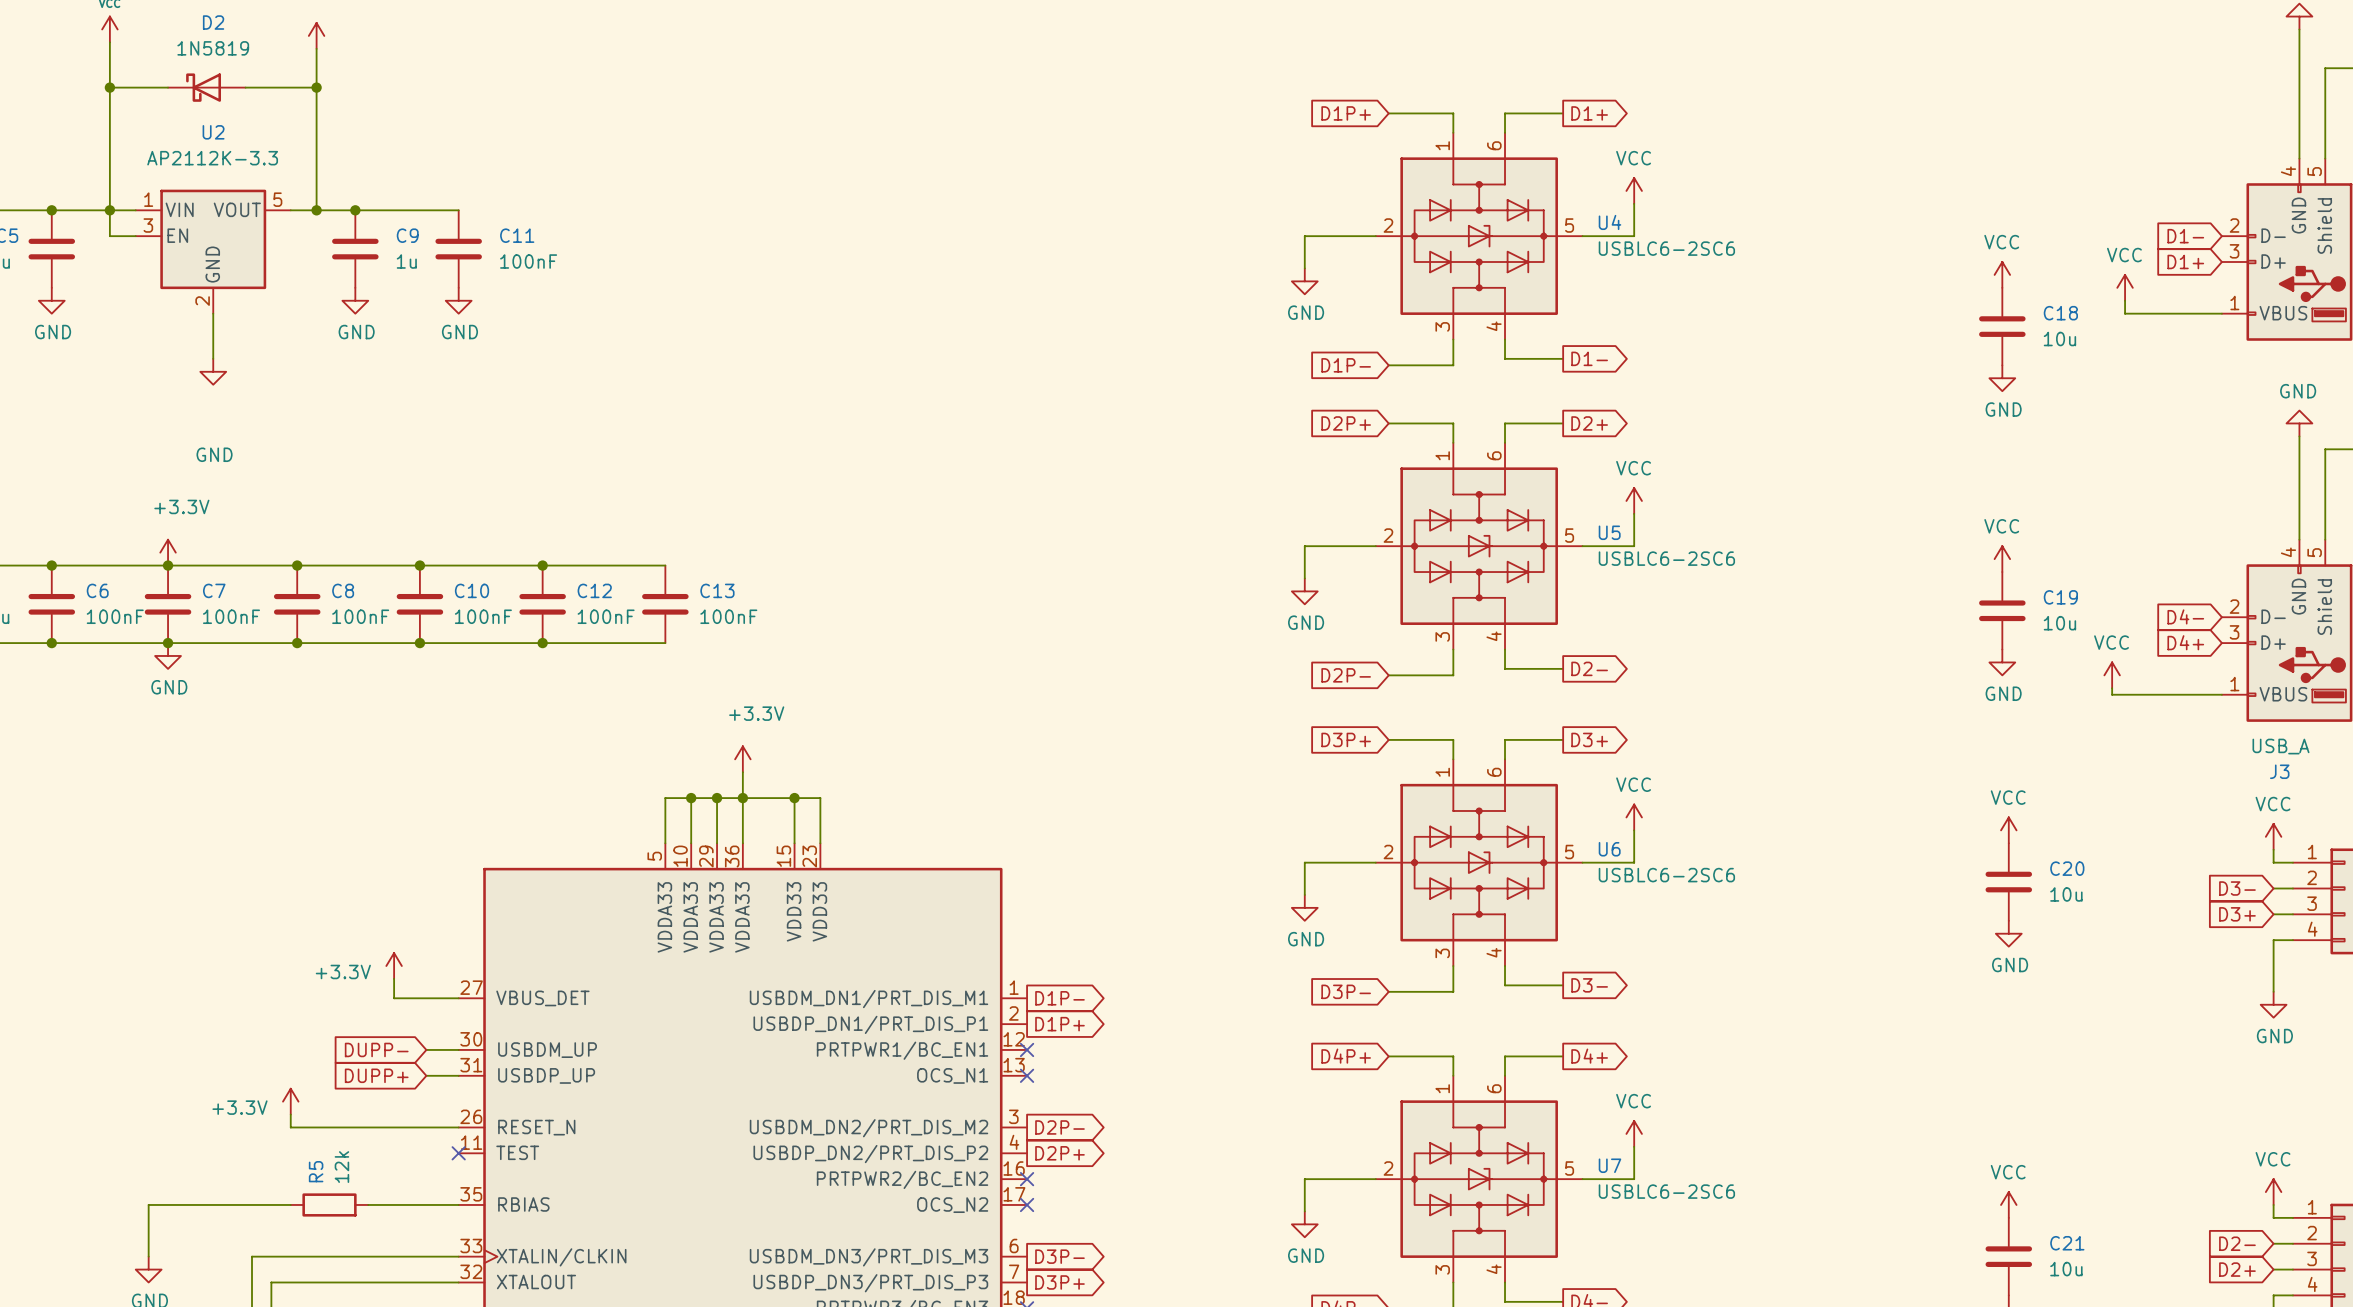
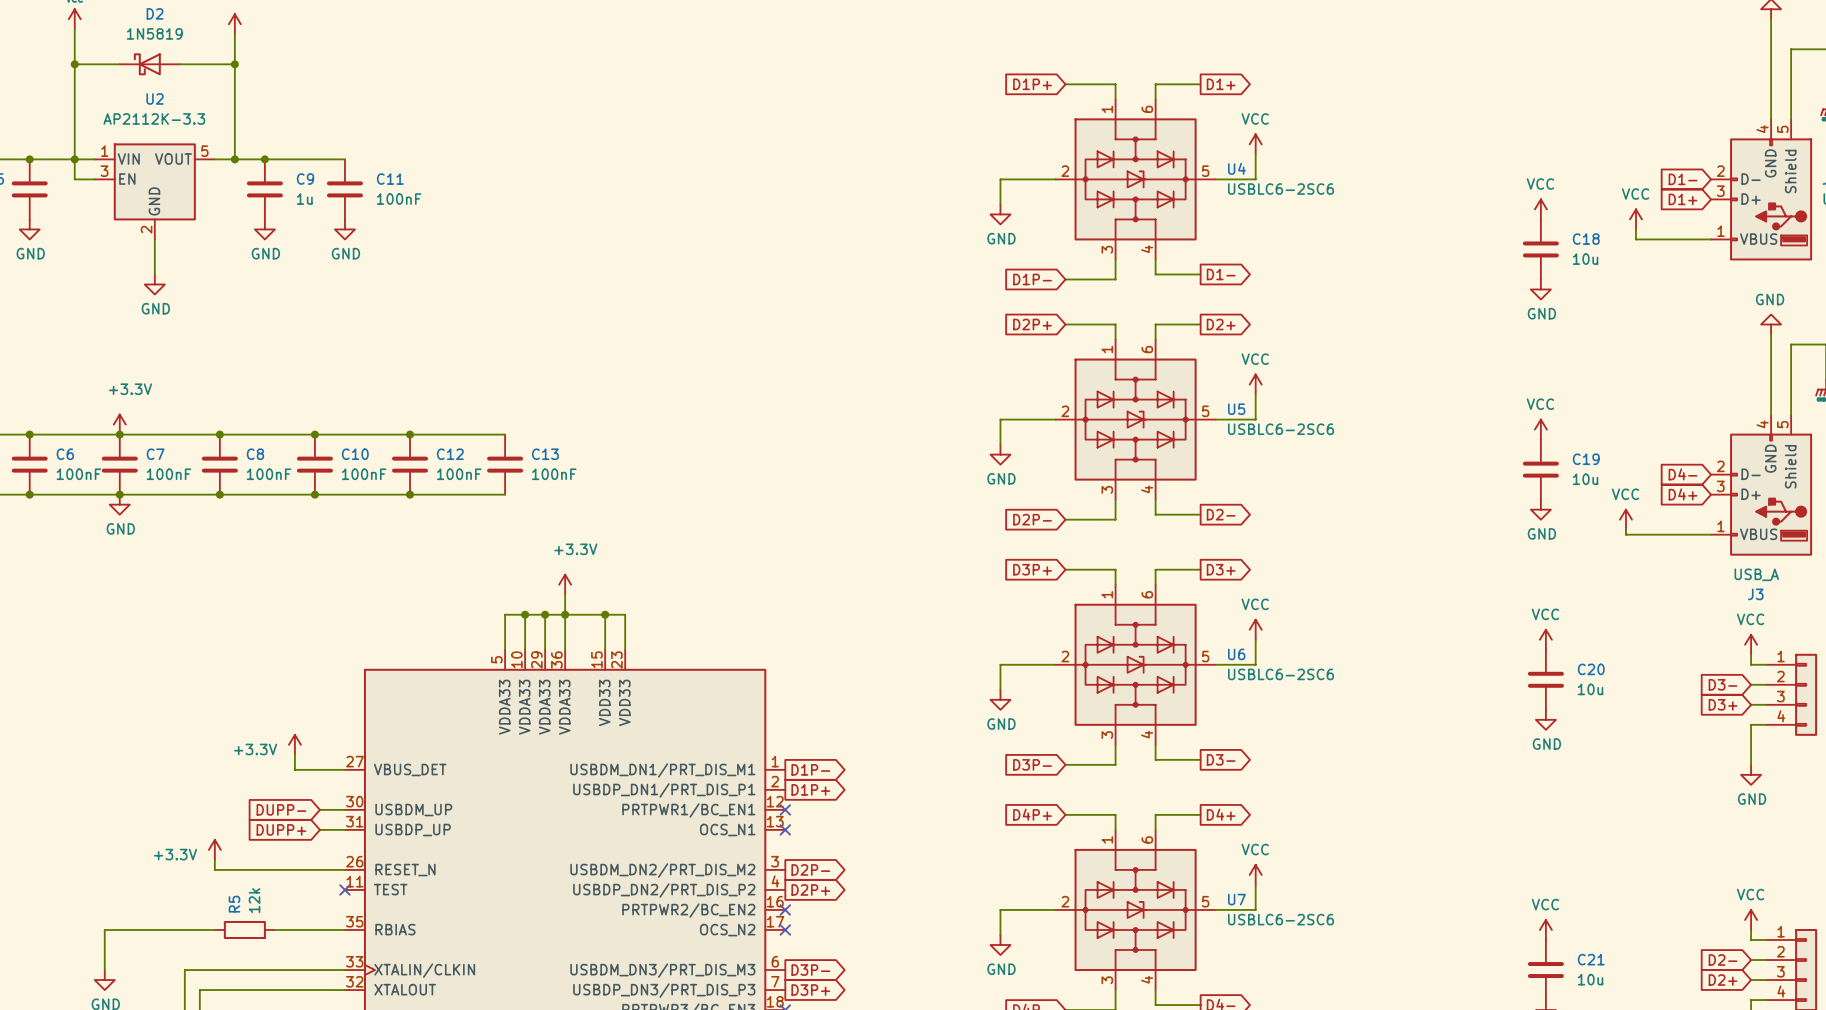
power symbol text position: GND (214, 454) -> GND (155, 308)

